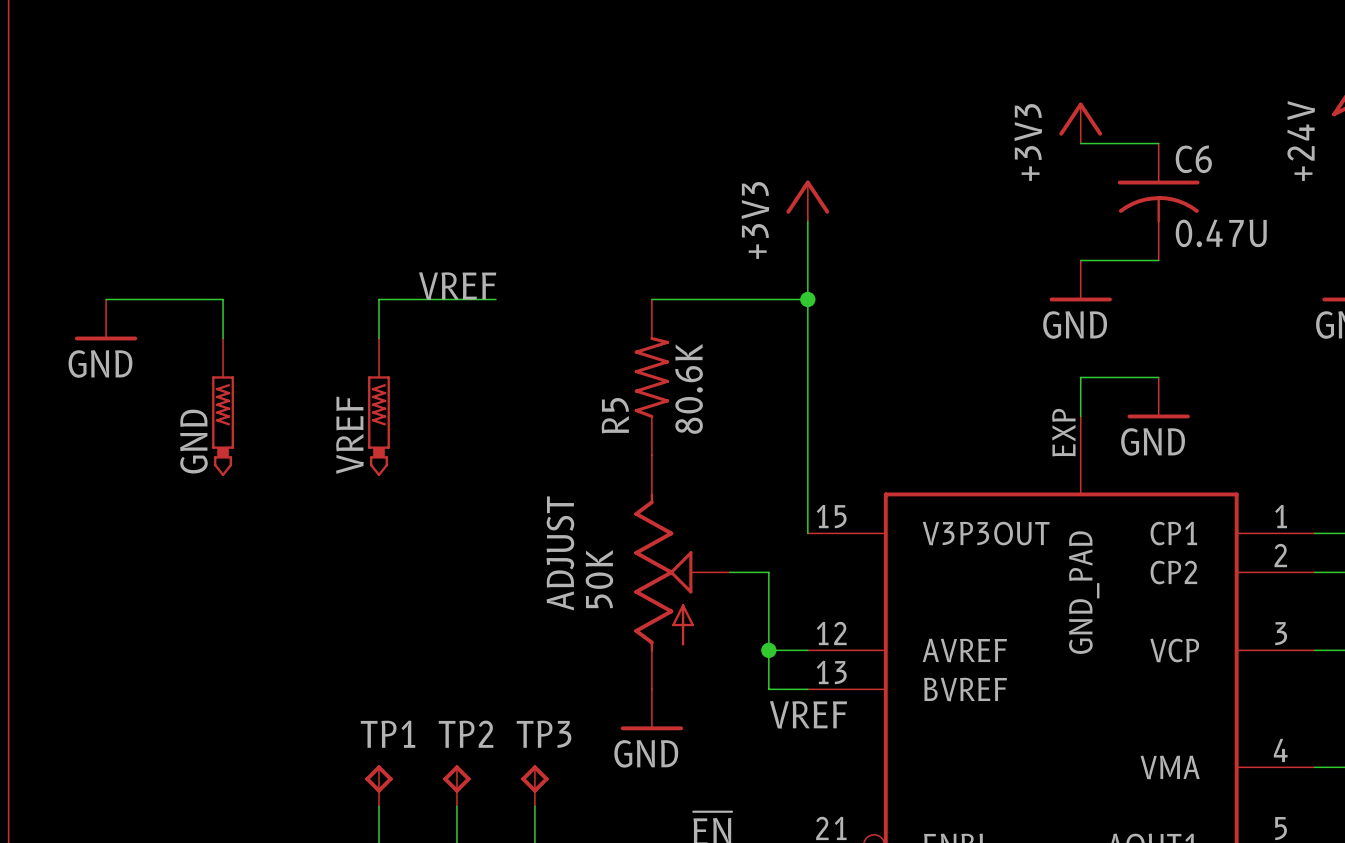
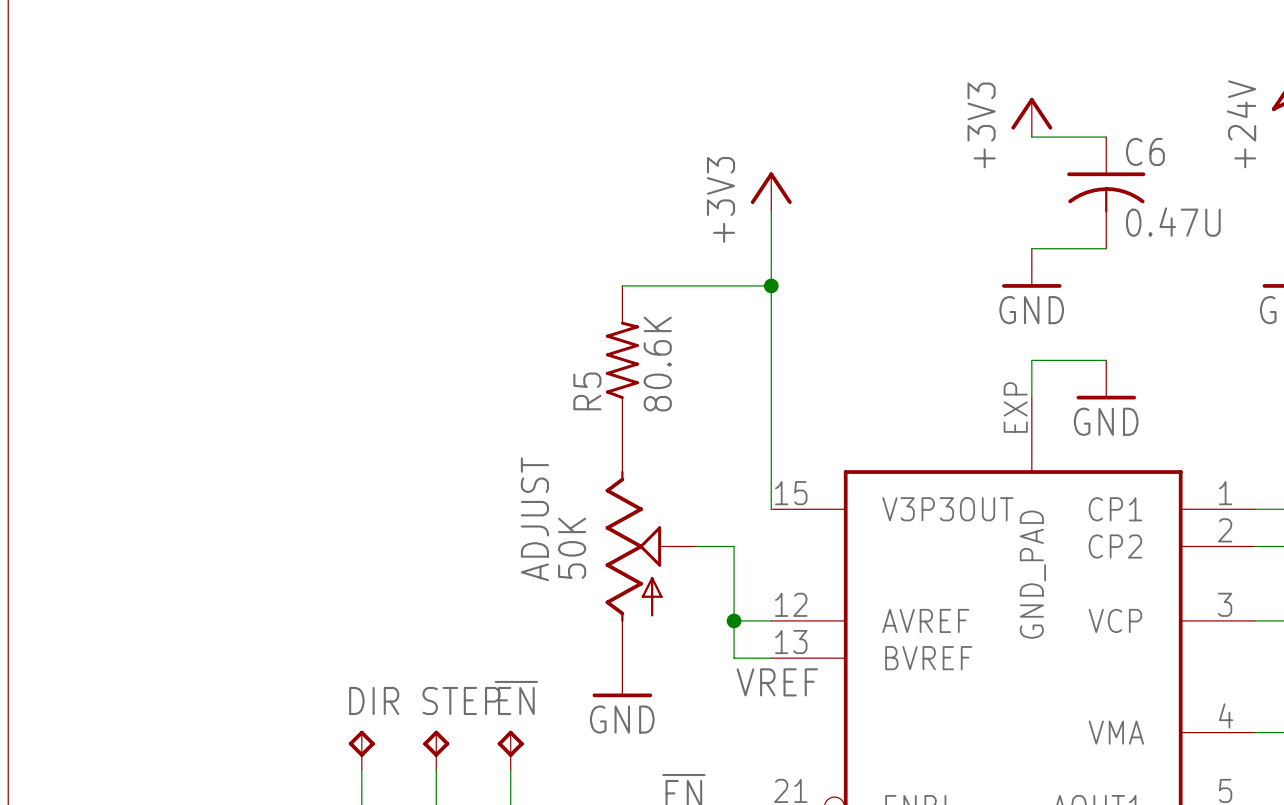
label: VREF (457, 286) -> none
wire: (106, 299) (223, 299) (223, 338) -> none
wire: (495, 299) (378, 299) (378, 338) -> none
power symbol: GND (106, 319) -> none
GND: (223, 407) -> none
VREF: (378, 407) -> none
TP1 name: TP1 (388, 734) -> DIR (374, 700)
TP2 name: TP2 (466, 734) -> STEP (461, 700)
TP3 name: TP3 (544, 734) -> ~{EN} (516, 697)

